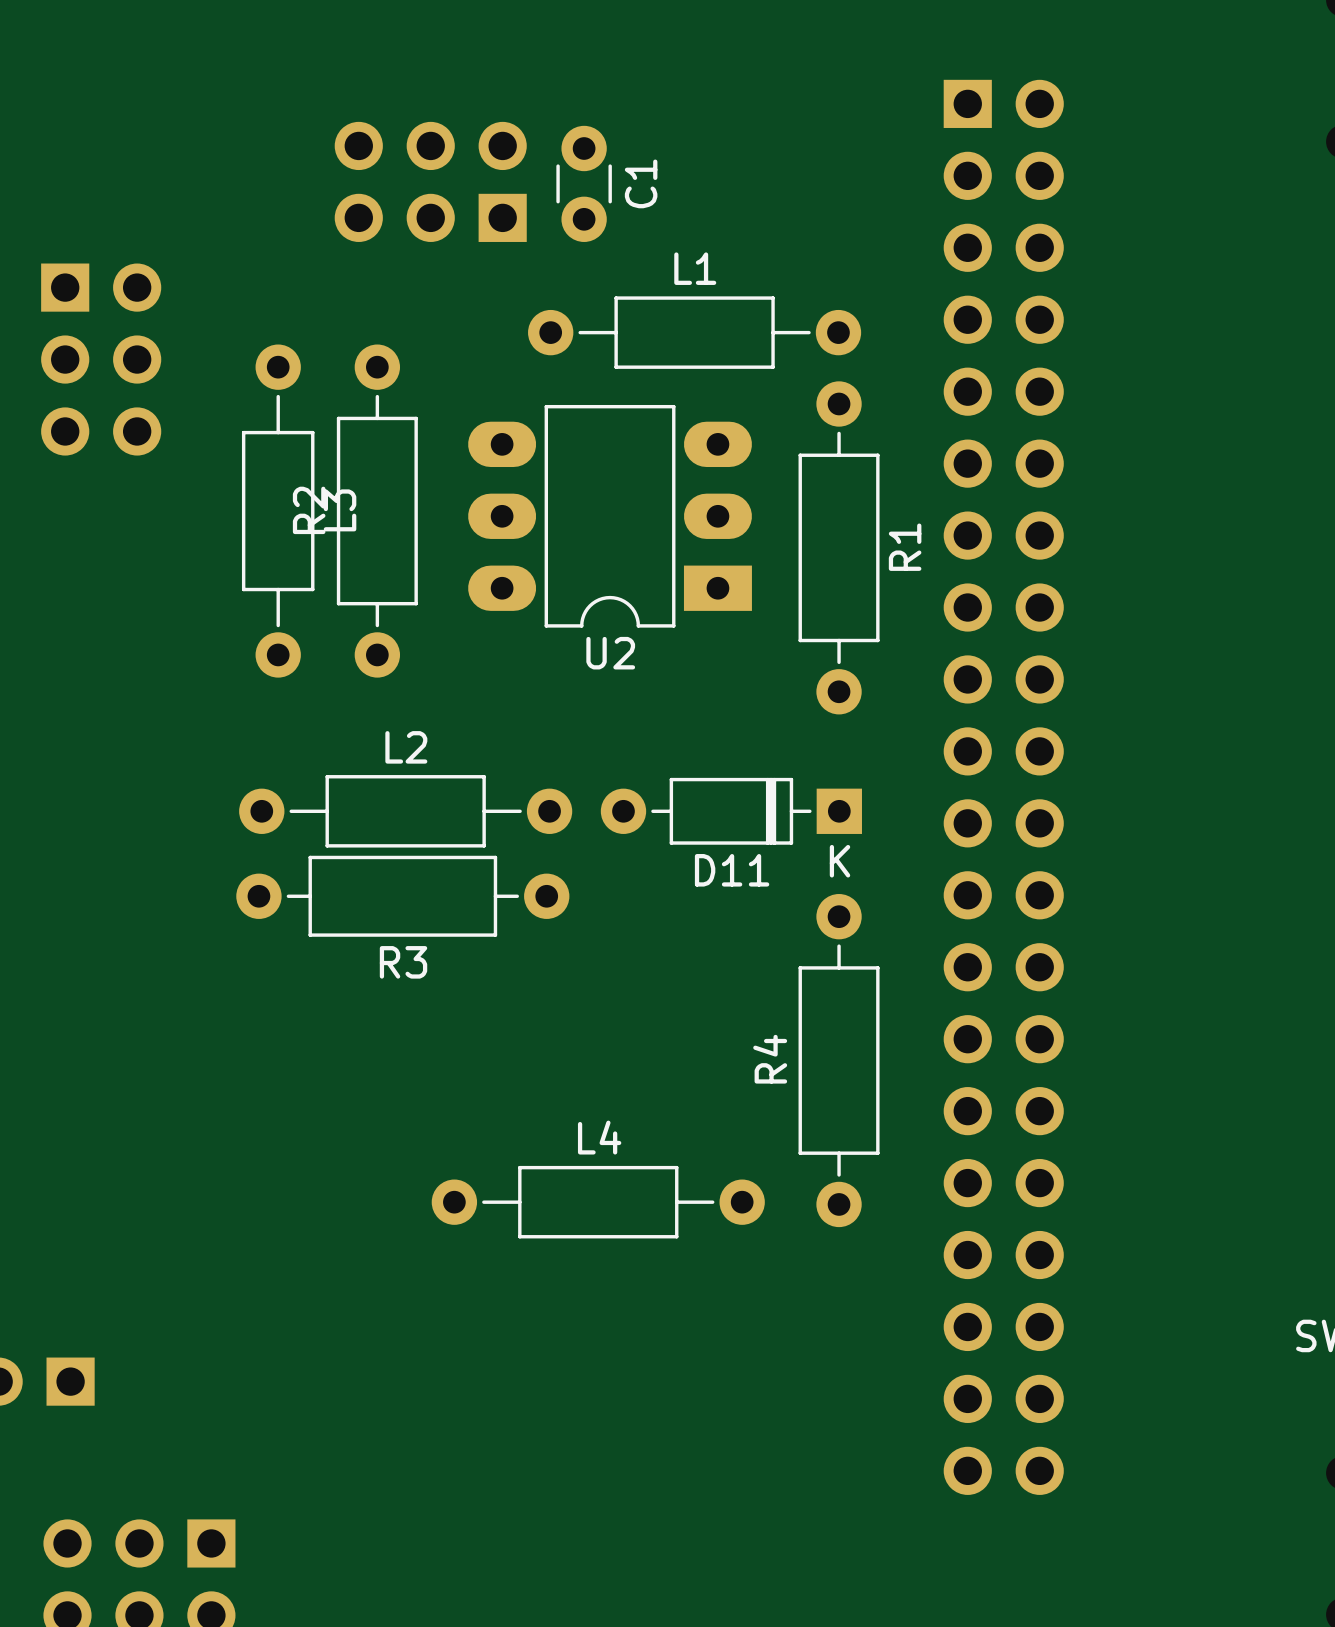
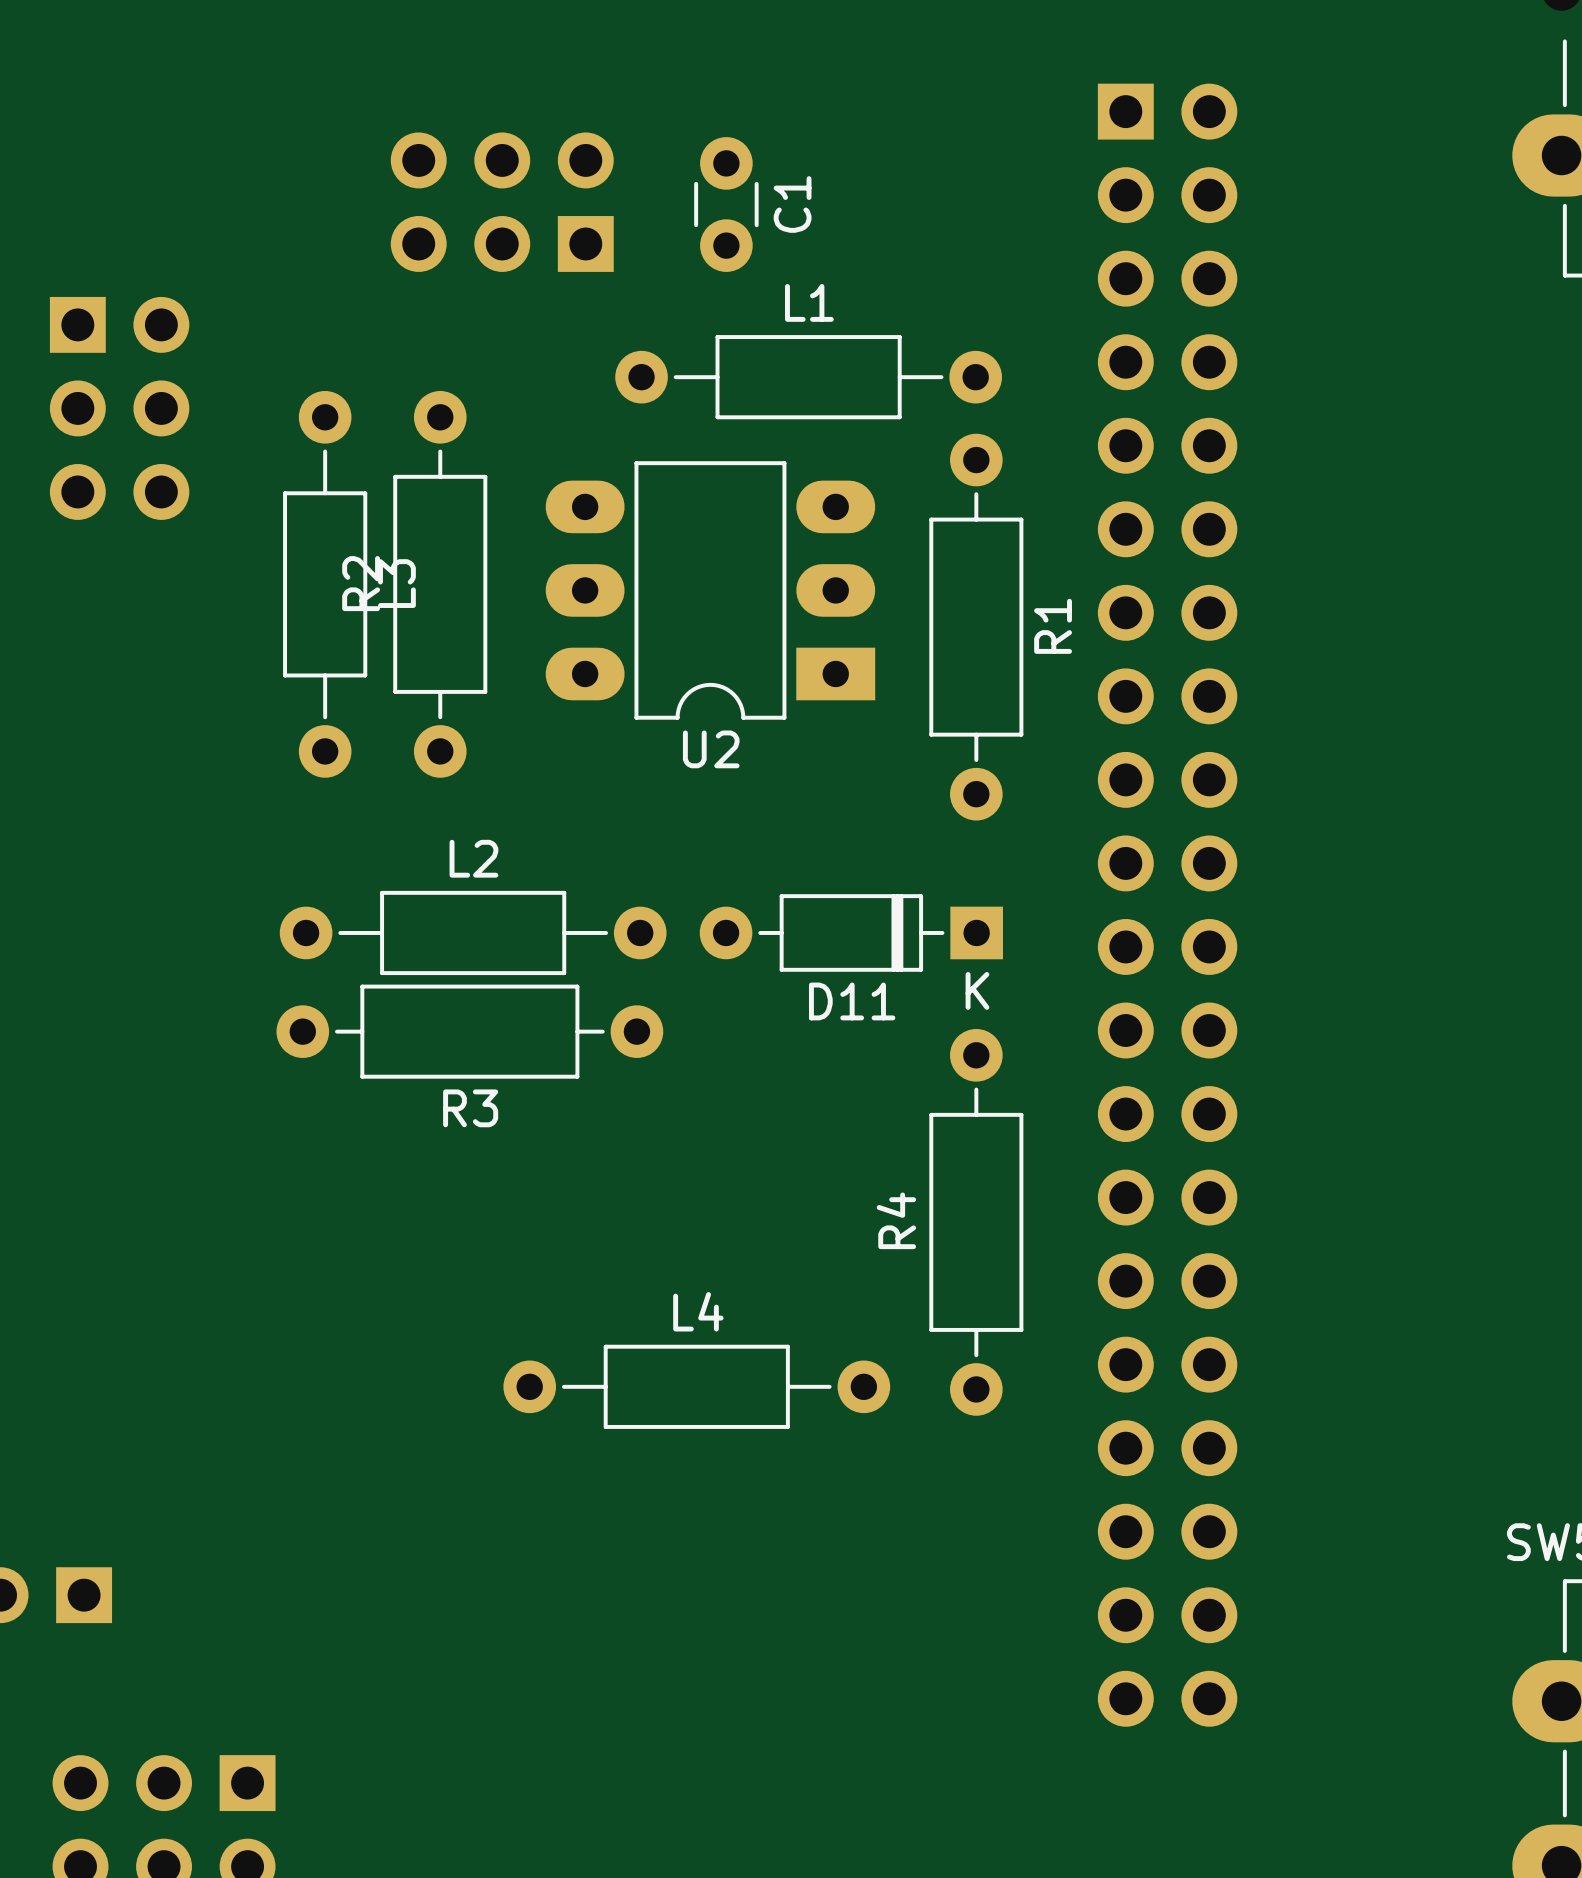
C1 position: (584, 183) -> (726, 204)

